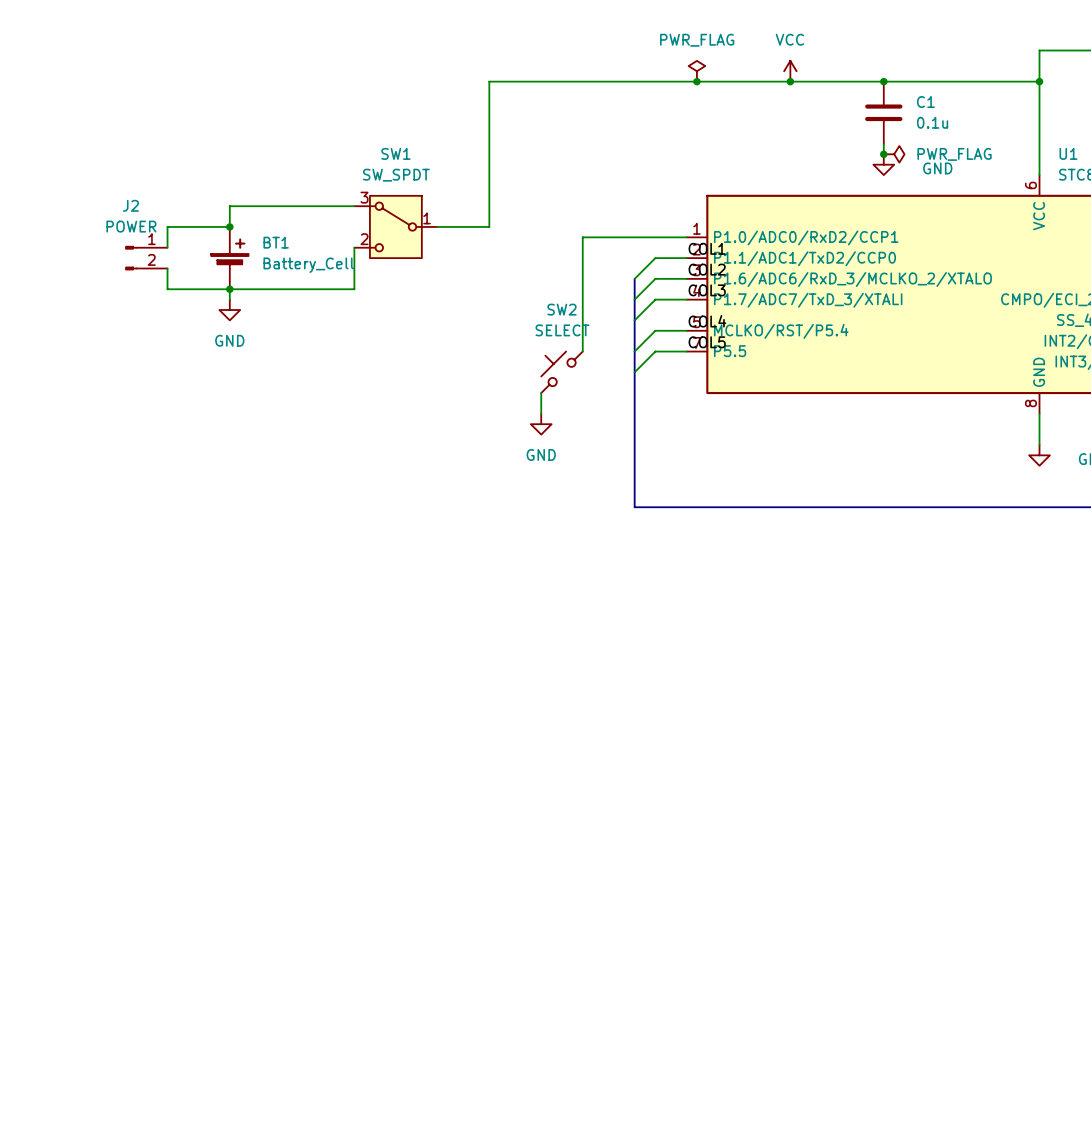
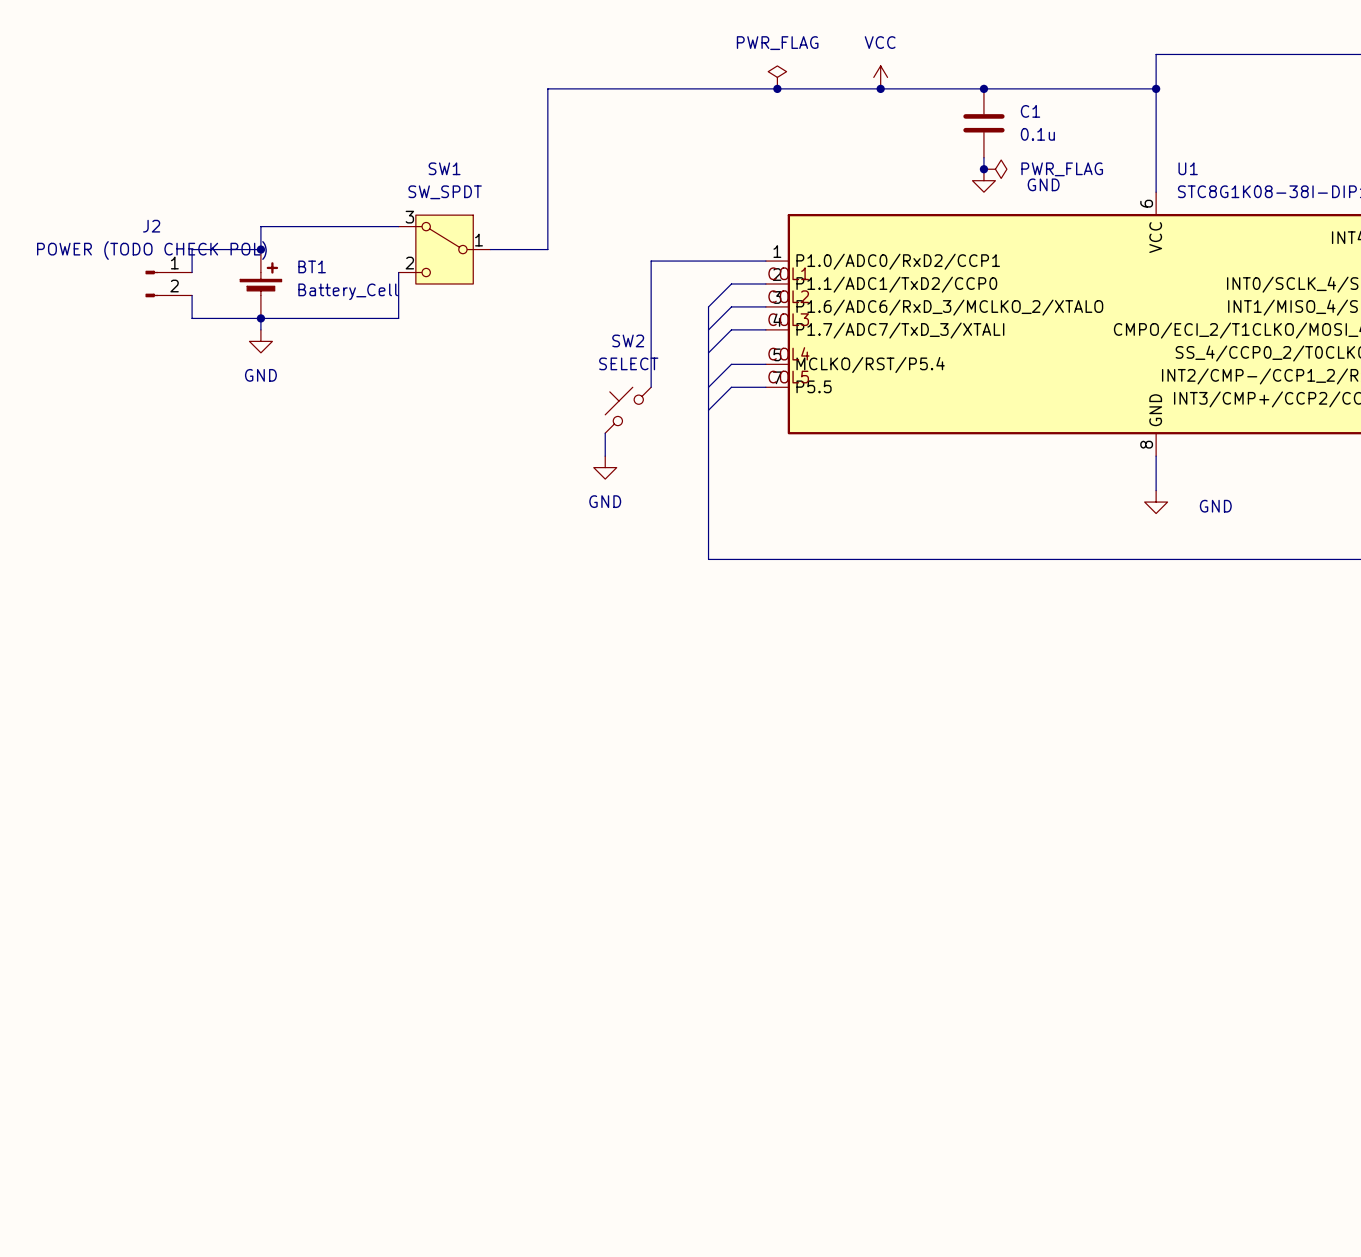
J2 value: POWER (131, 226) -> POWER (TODO CHECK POL) (151, 250)

